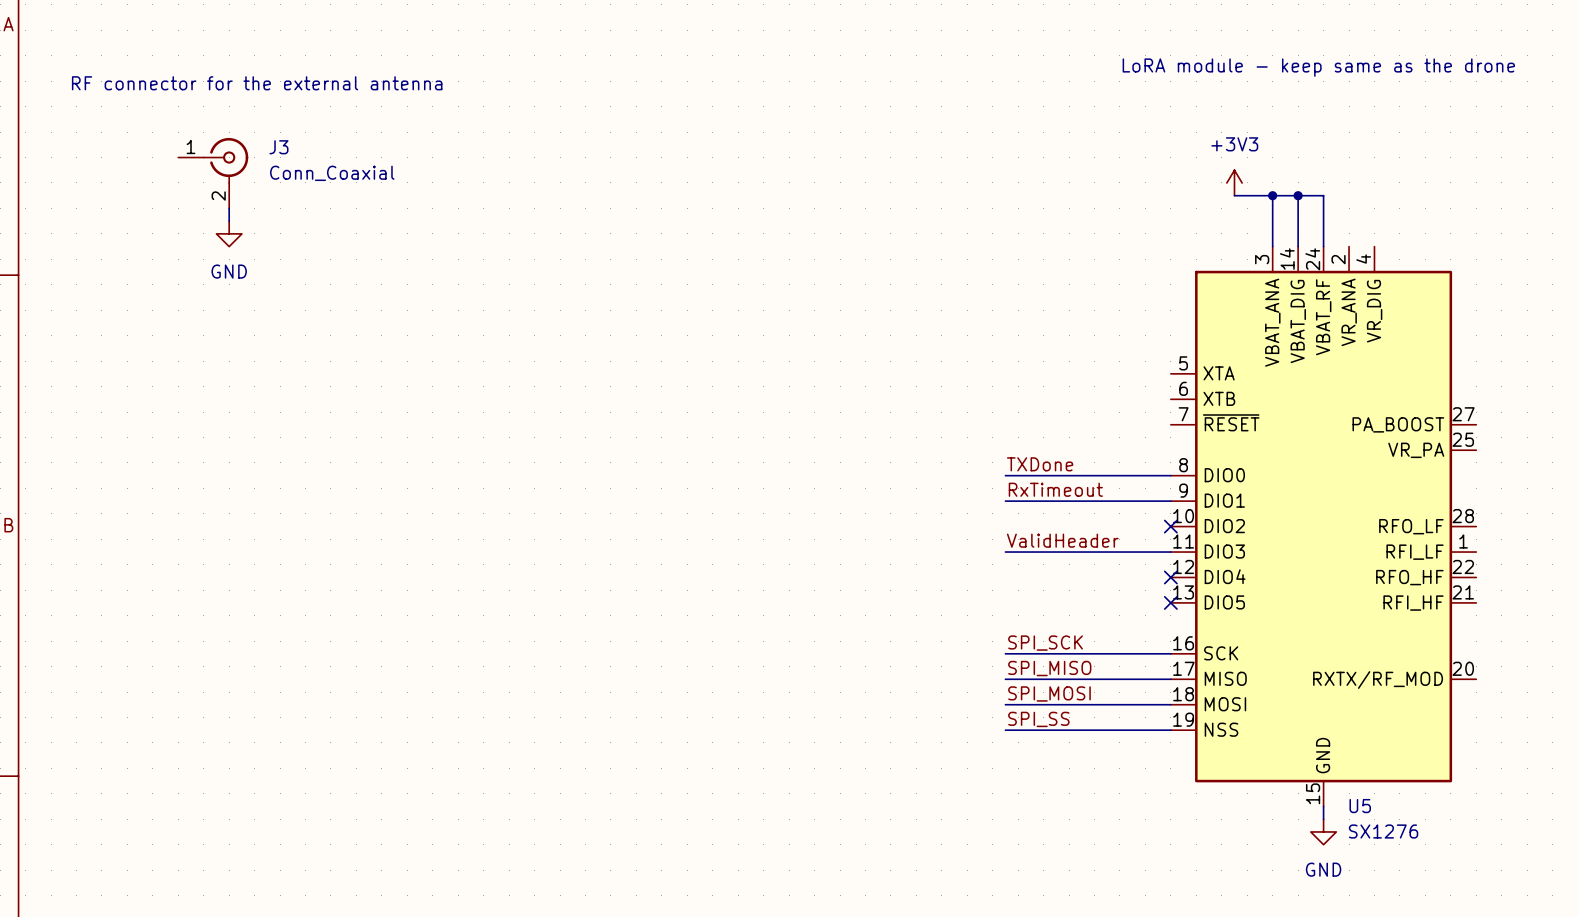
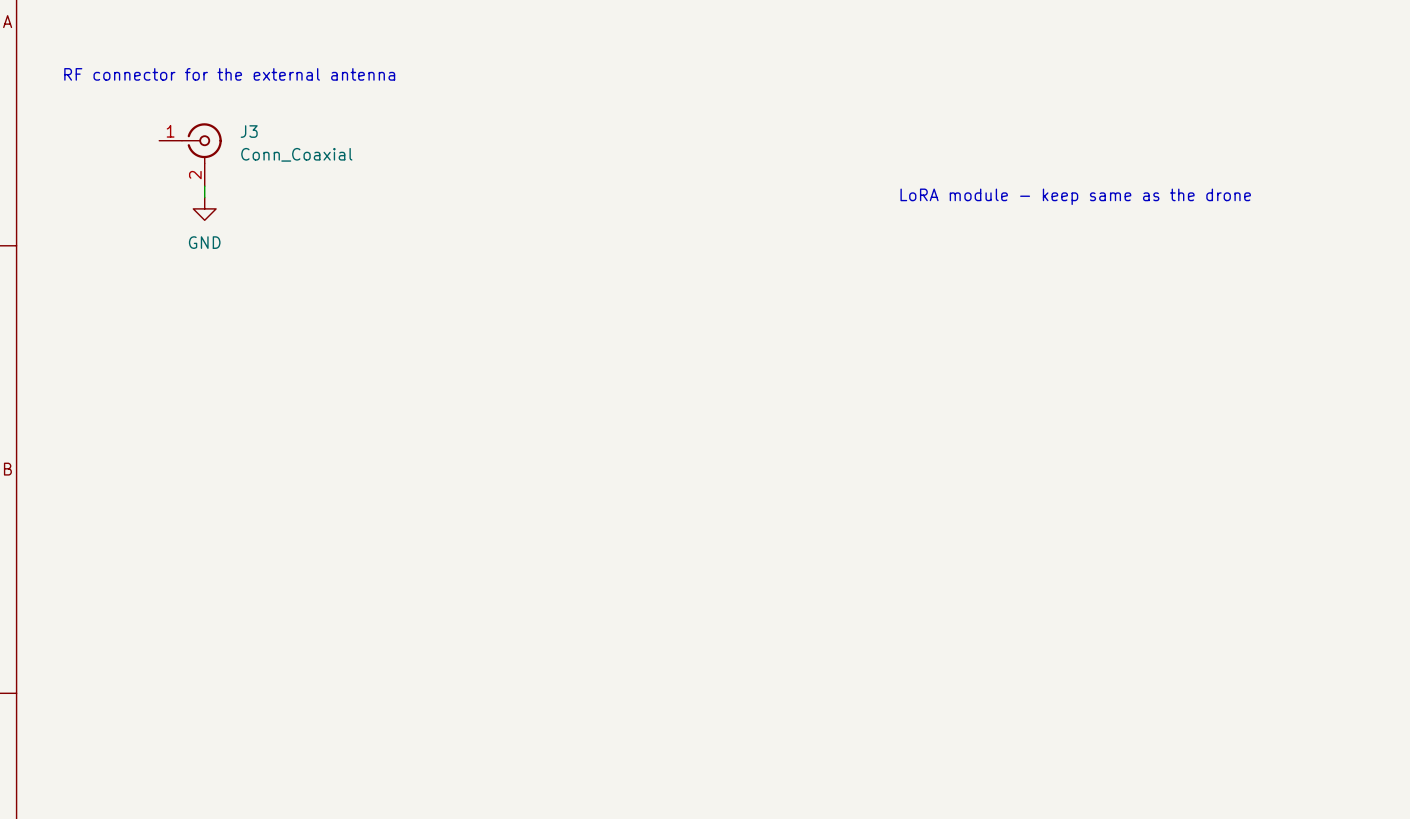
text position: LoRA module - keep same as the drone (1318, 67) -> LoRA module - keep same as the drone (1075, 196)
power symbol: +3V3 (1234, 182) -> none
wire: (1234, 195) (1323, 195) (1323, 246) -> none
wire: (1272, 195) (1272, 246) -> none
junction: (1272, 195) -> none
wire: (1298, 195) (1298, 246) -> none
junction: (1298, 195) -> none
label: TXDone (1040, 464) -> none
wire: (1005, 475) (1170, 475) -> none
label: RxTimeout (1055, 489) -> none
wire: (1005, 501) (1170, 501) -> none
no-connect mark: (1170, 526) -> none
U5: SX1276 (1323, 526) -> none
label: ValidHeader (1062, 540) -> none
wire: (1005, 552) (1170, 552) -> none
no-connect mark: (1170, 577) -> none
no-connect mark: (1170, 602) -> none
label: SPI_SCK (1045, 643) -> none
wire: (1005, 653) (1170, 653) -> none
label: SPI_MISO (1049, 668) -> none
wire: (1005, 679) (1170, 679) -> none
label: SPI_MOSI (1049, 693) -> none
wire: (1005, 704) (1170, 704) -> none
label: SPI_SS (1038, 719) -> none
wire: (1005, 730) (1170, 730) -> none
wire: (1323, 806) (1323, 819) -> none
power symbol: GND (1323, 831) -> none

